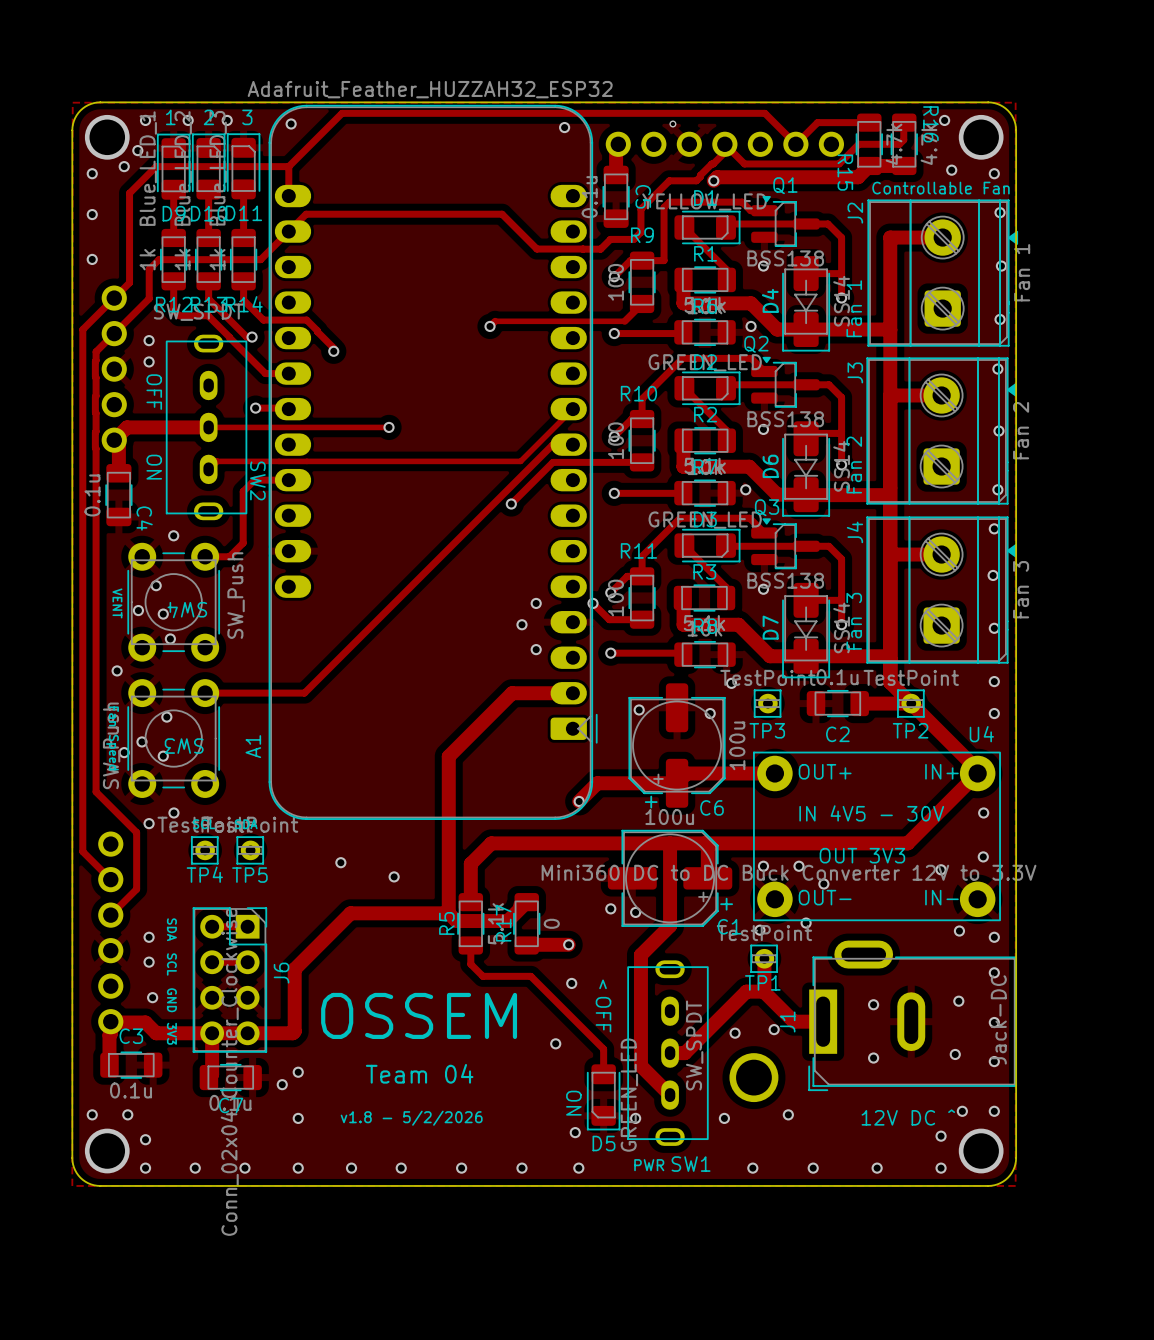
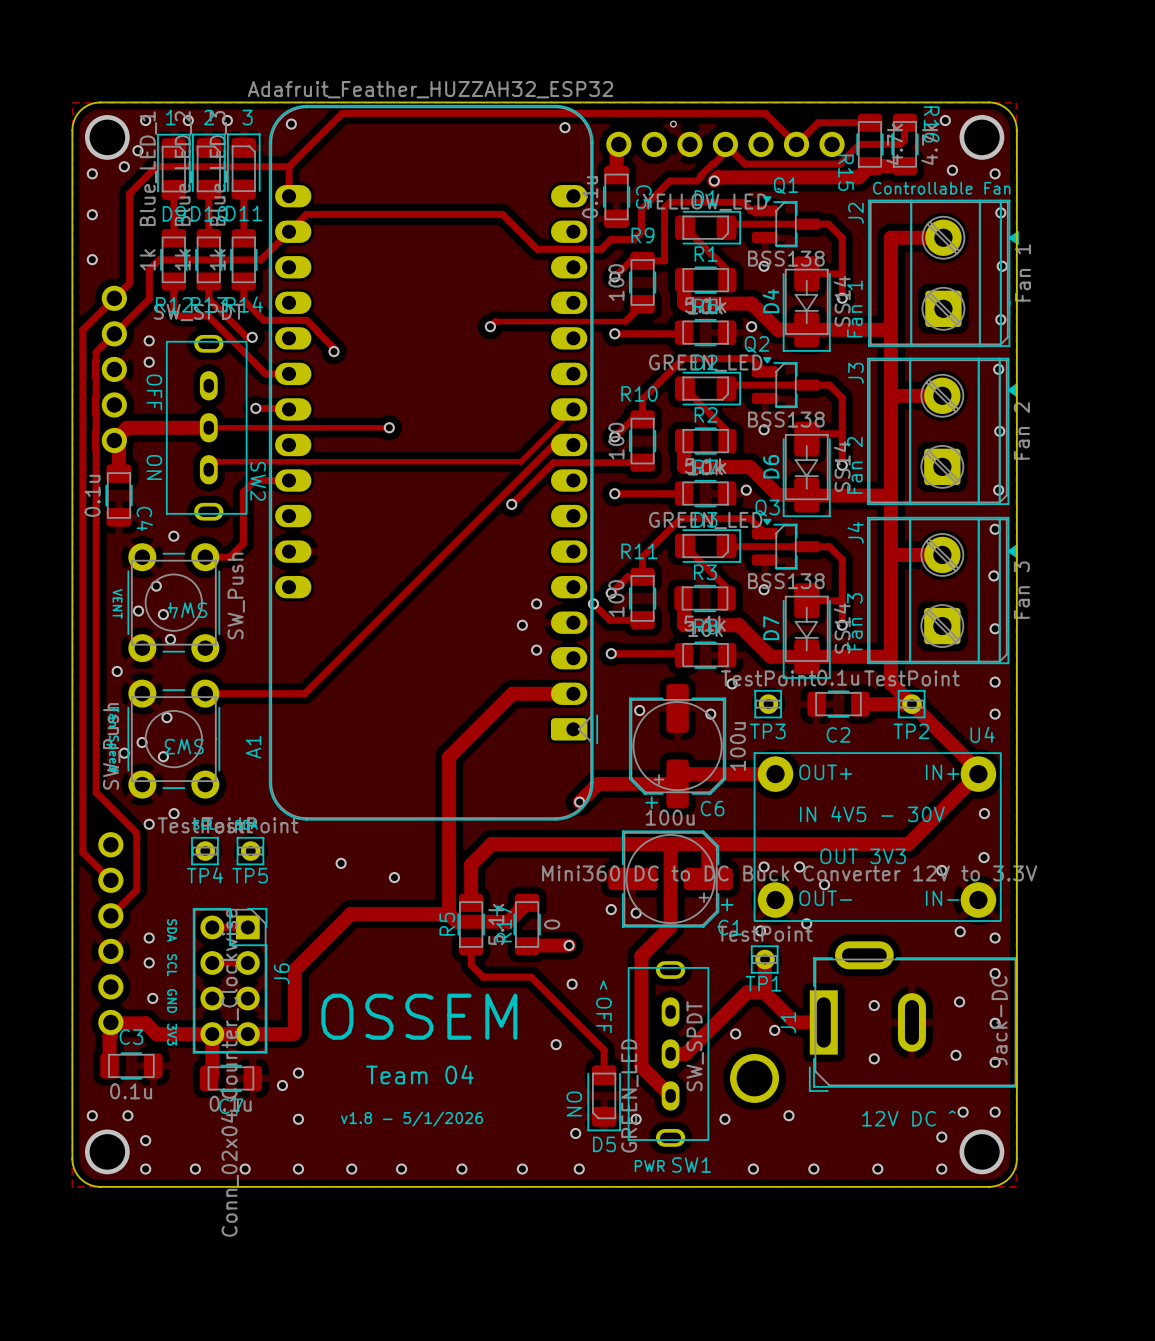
text: v1.8 - 5/2/2026 (411, 1118) -> v1.8 - 5/1/2026 (411, 1119)

